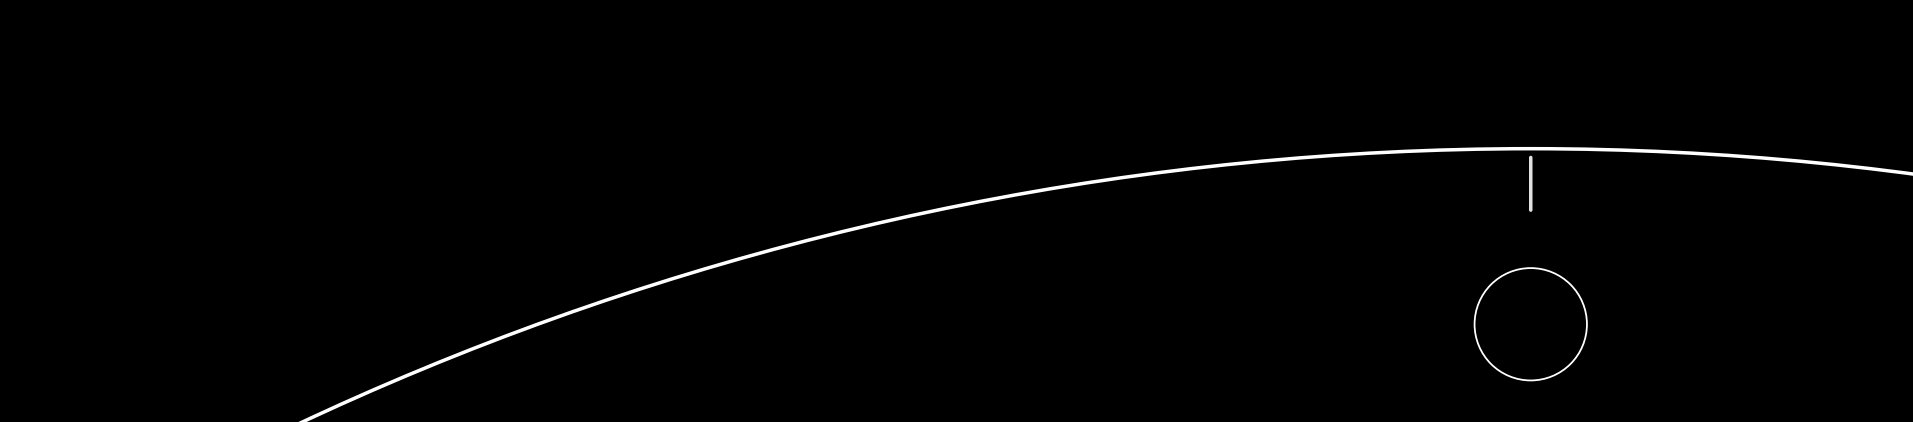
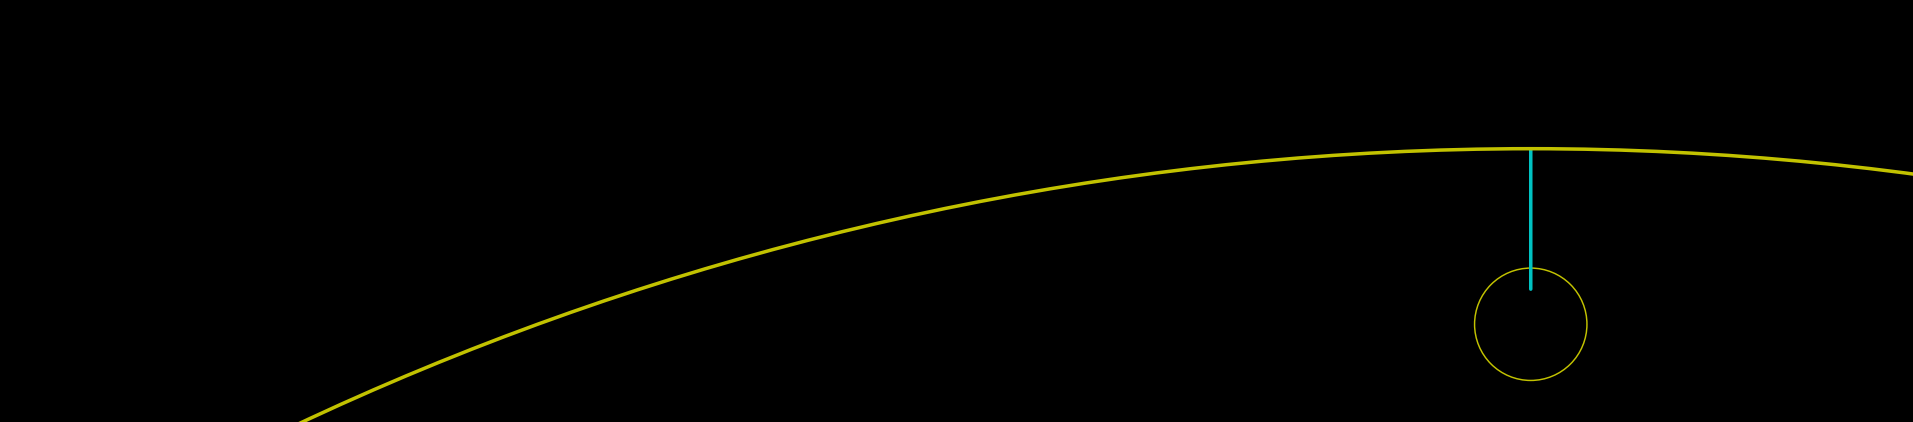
line: none -> (1530, 148) (1530, 157)
line: none -> (1530, 210) (1530, 289)

